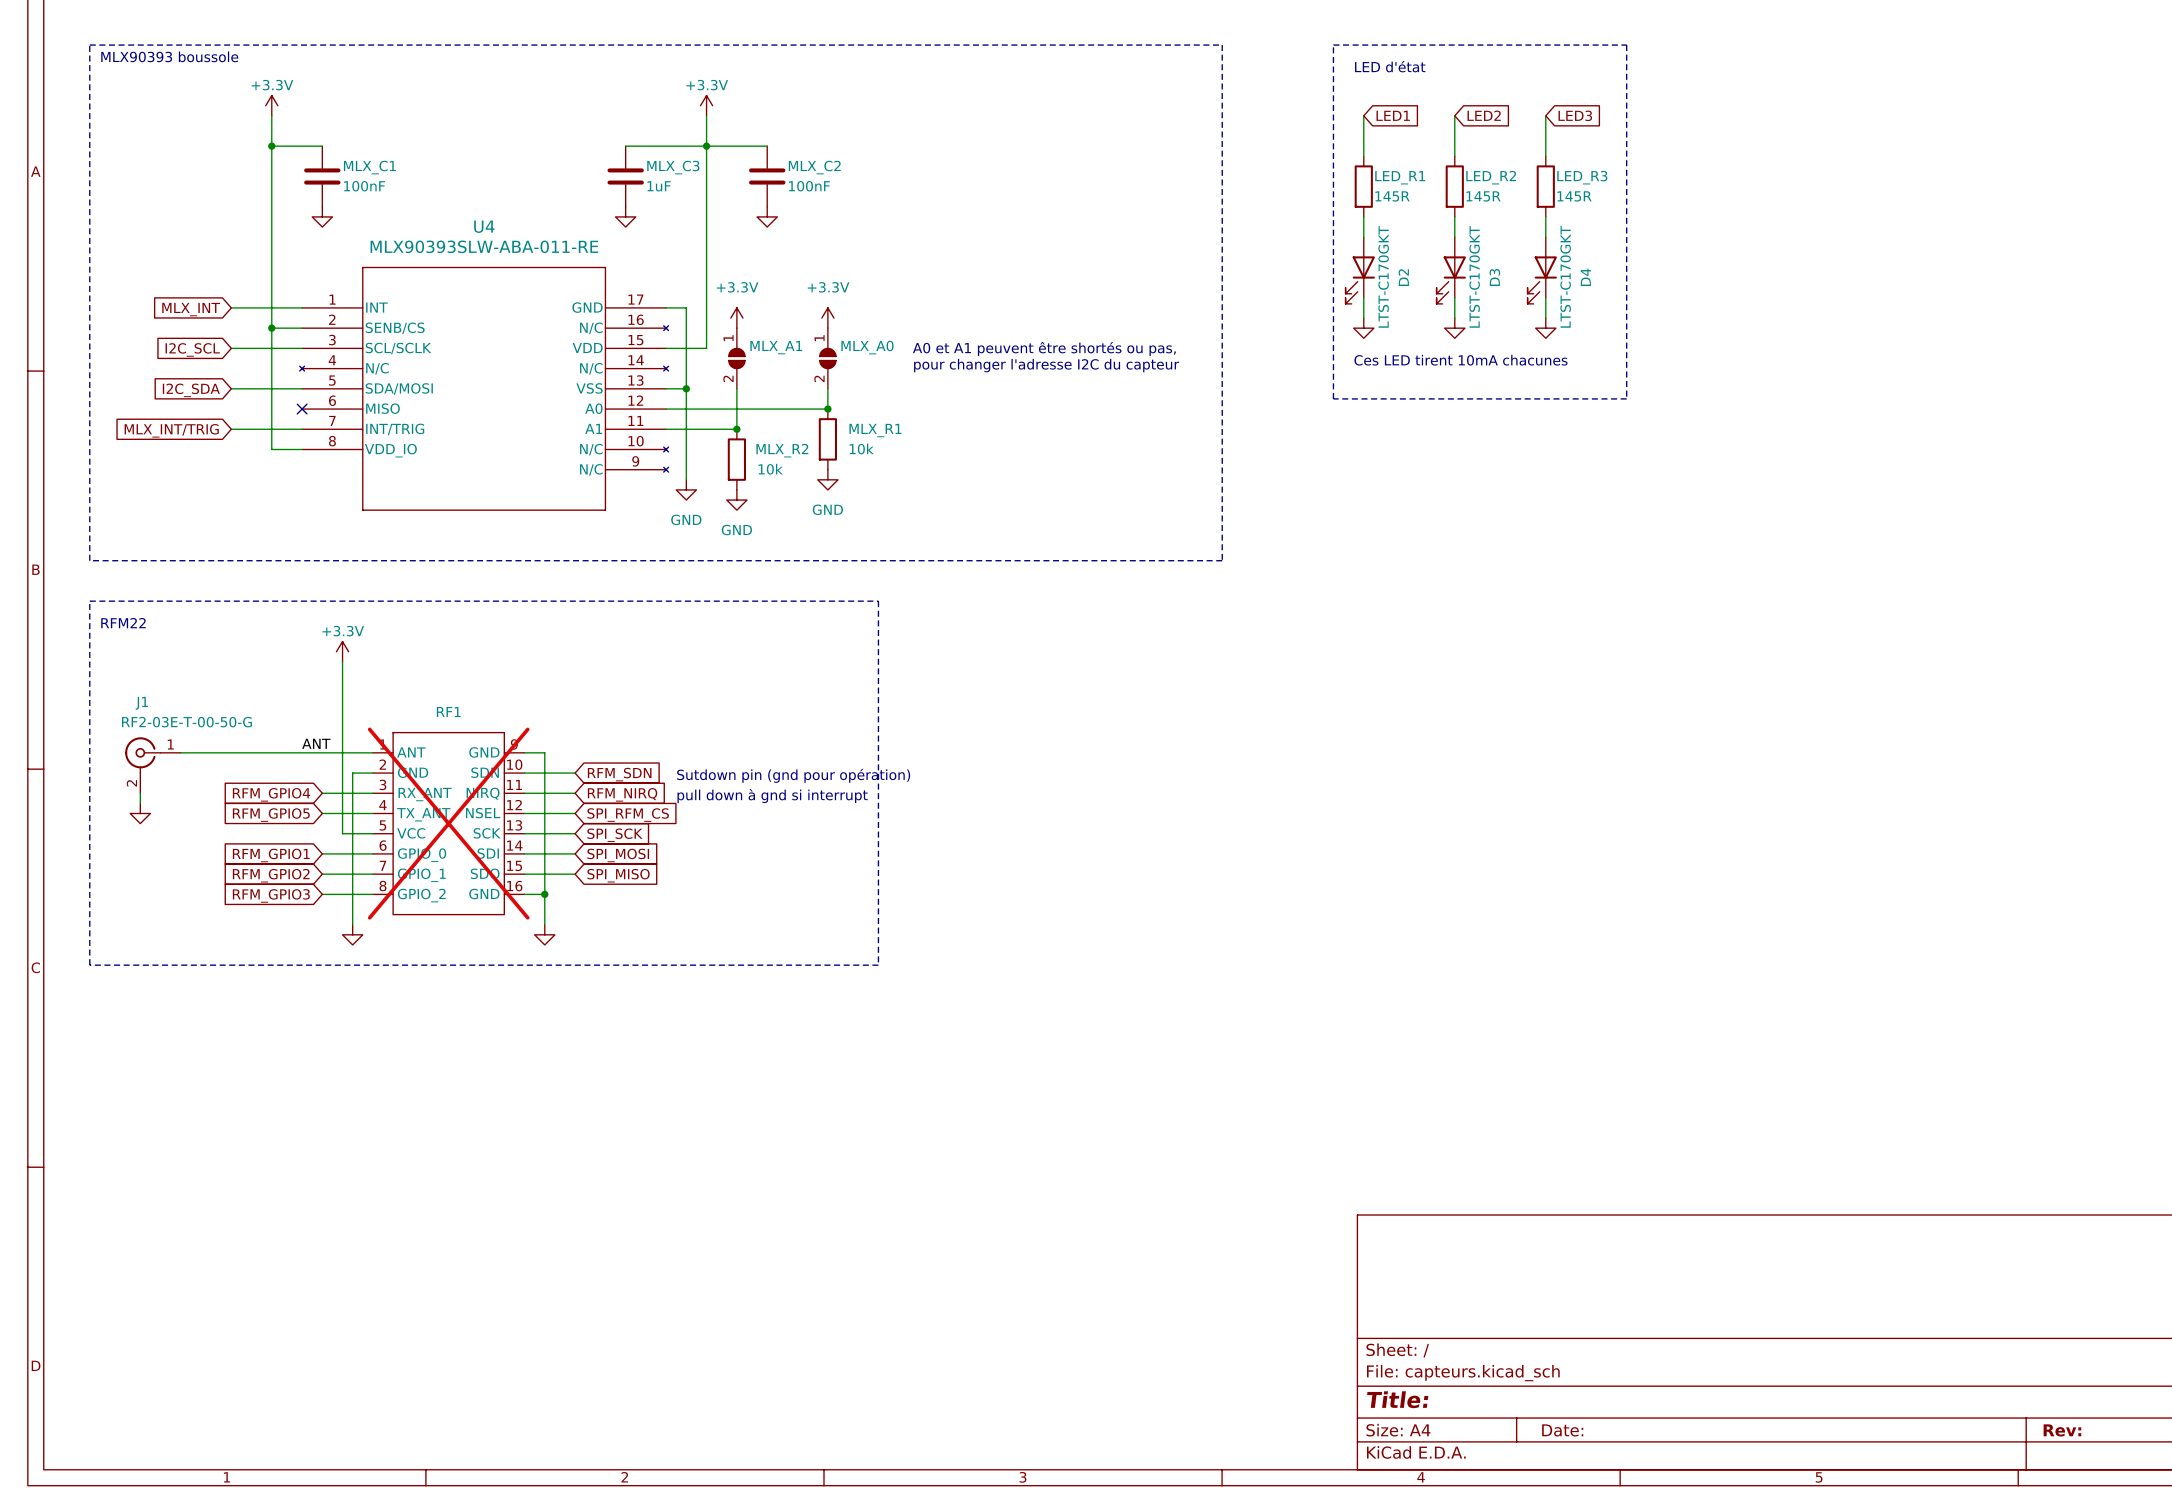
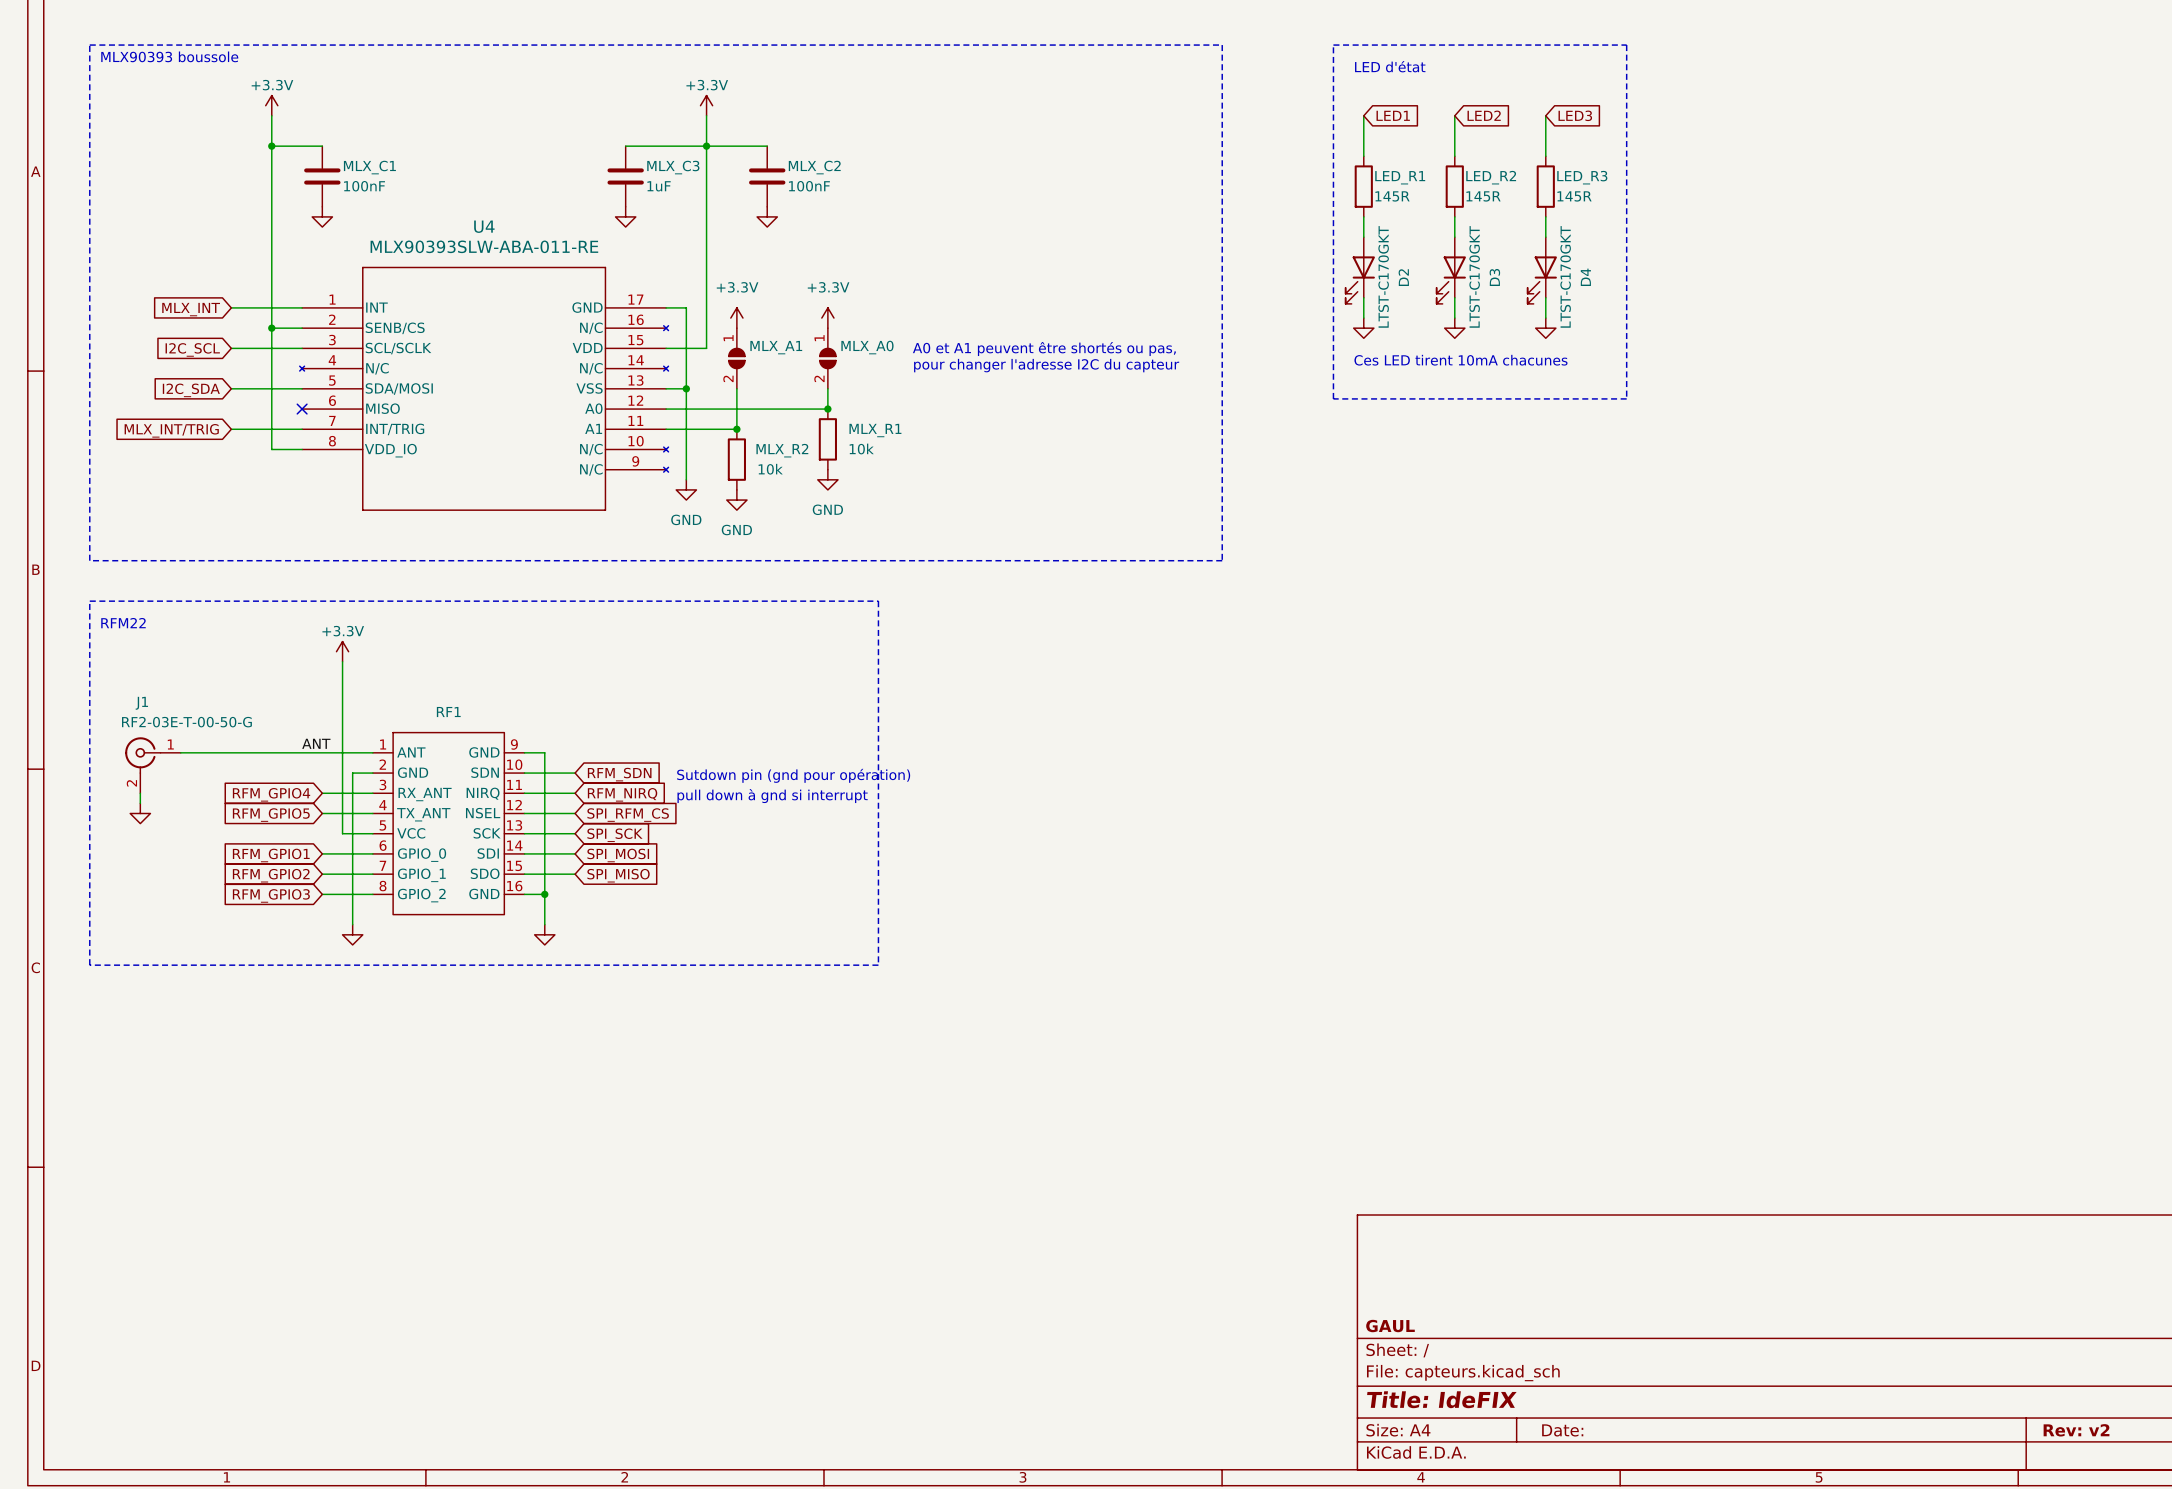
RF1 do-not-place cross: (448, 823) -> none
title block: none -> GAUL (1390, 1326)
title block: Title: (1397, 1399) -> Title: IdeFIX (1441, 1399)
title block: Rev: (2062, 1430) -> Rev: v2 (2076, 1430)

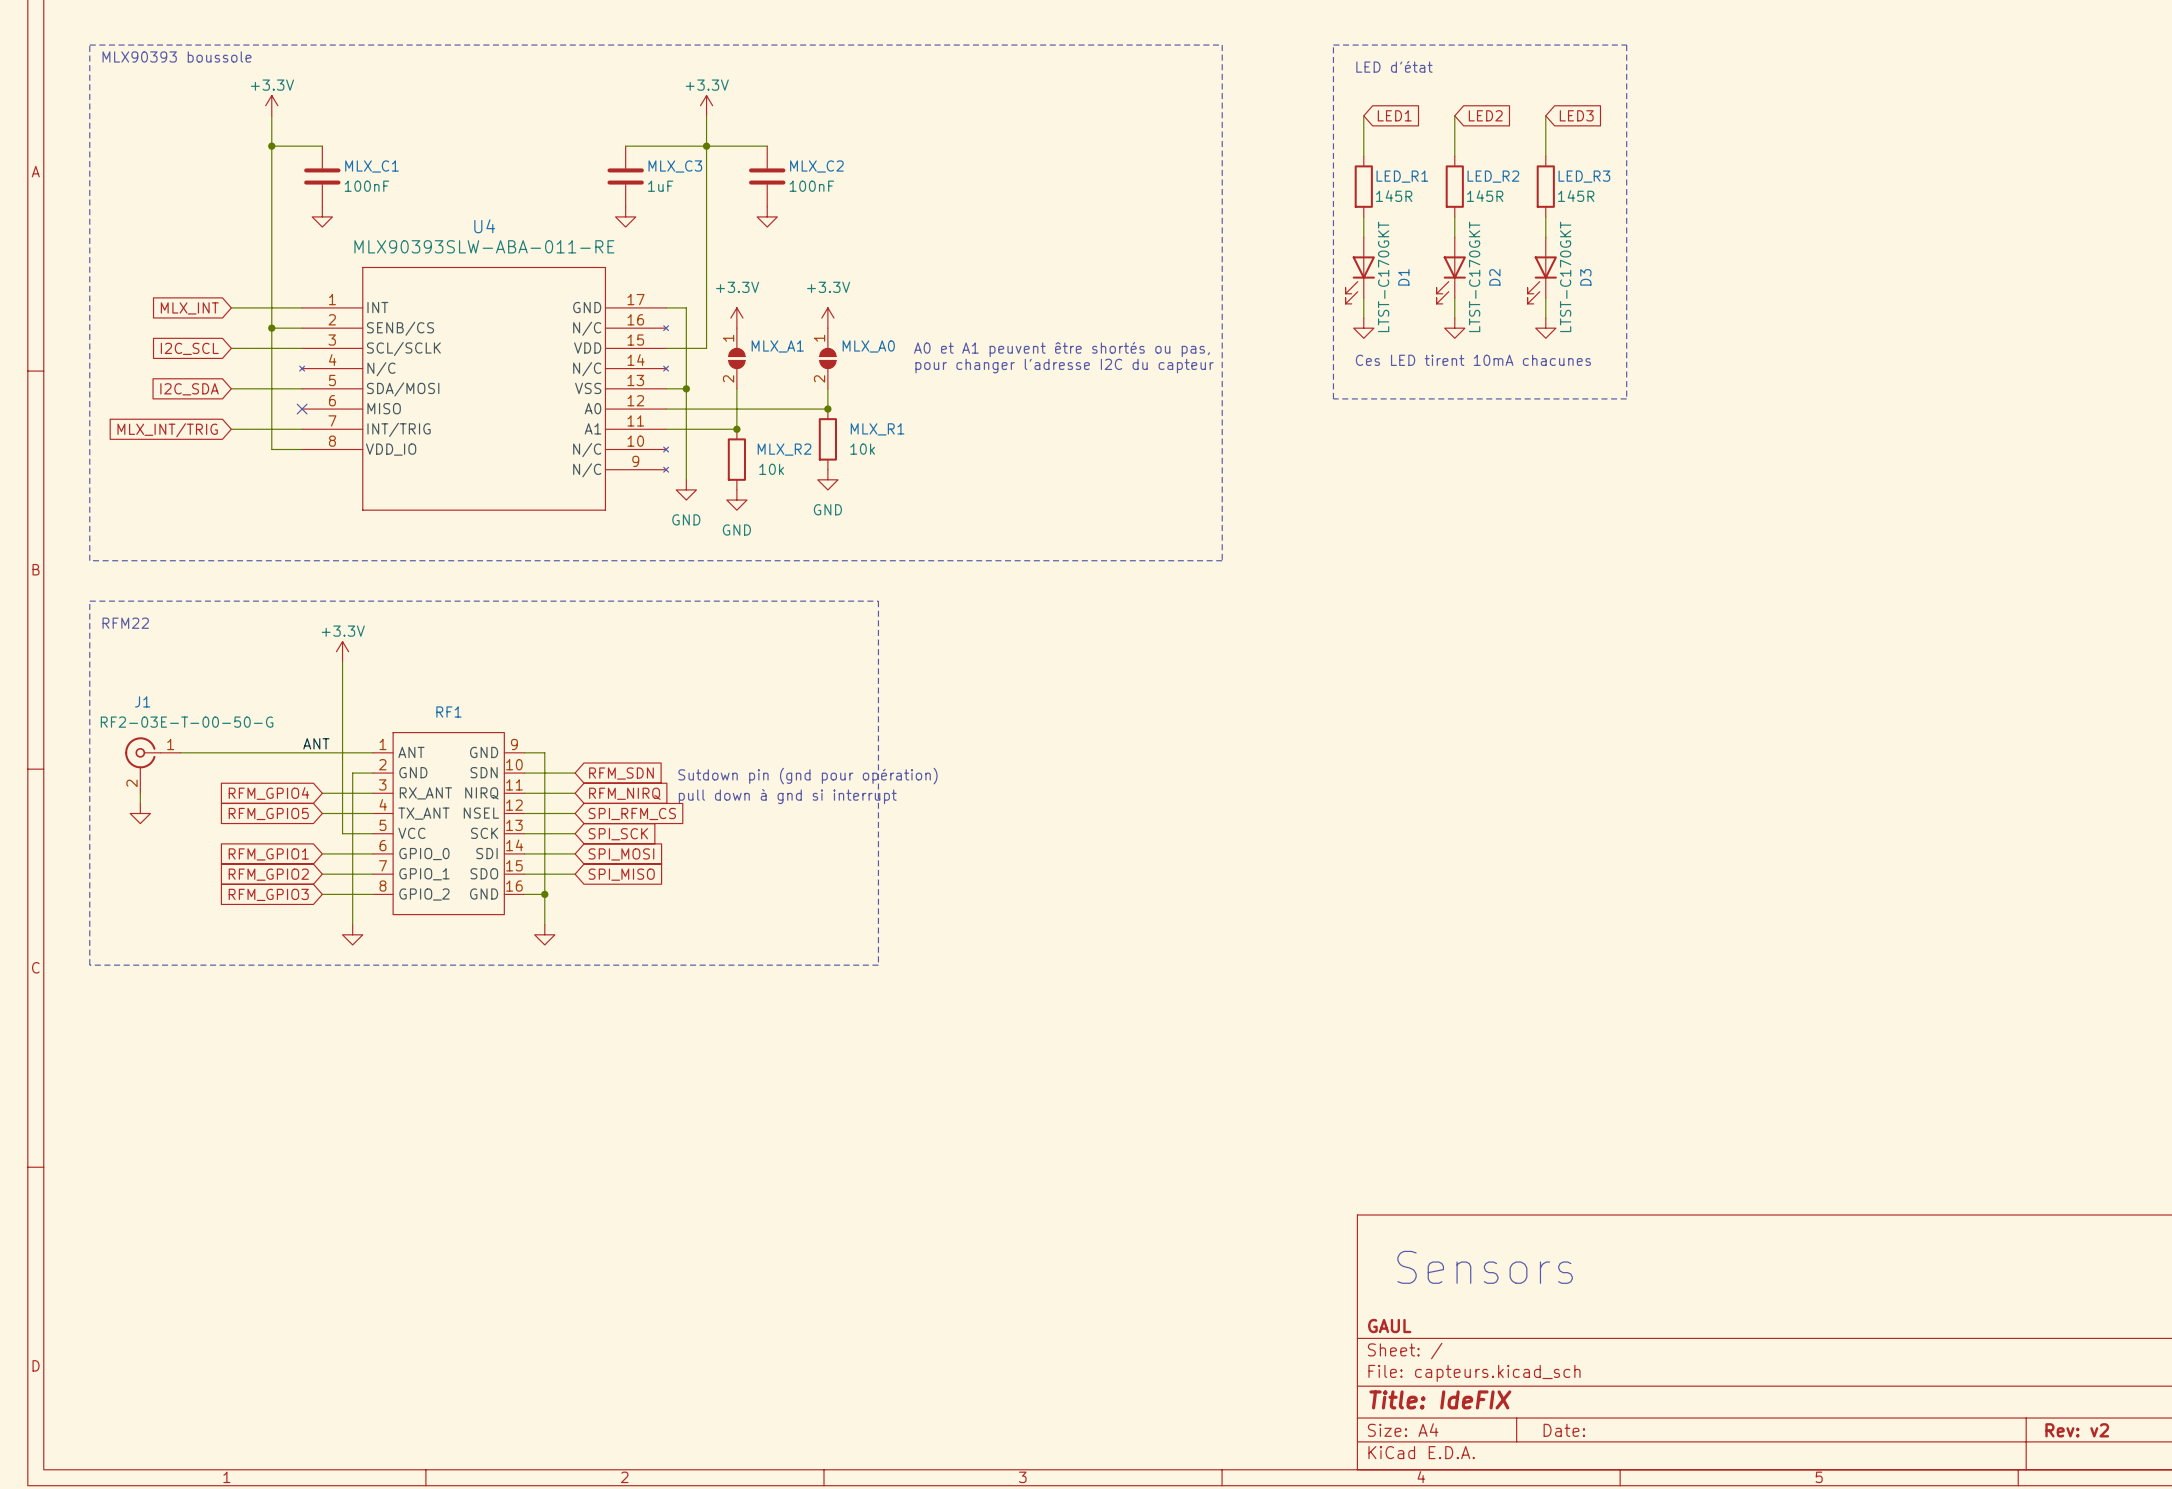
D2 name: D2 (1403, 277) -> D1 (1403, 277)
D3 name: D3 (1494, 277) -> D2 (1494, 277)
D4 name: D4 (1585, 277) -> D3 (1585, 277)
text: none -> Sensors (1485, 1267)

